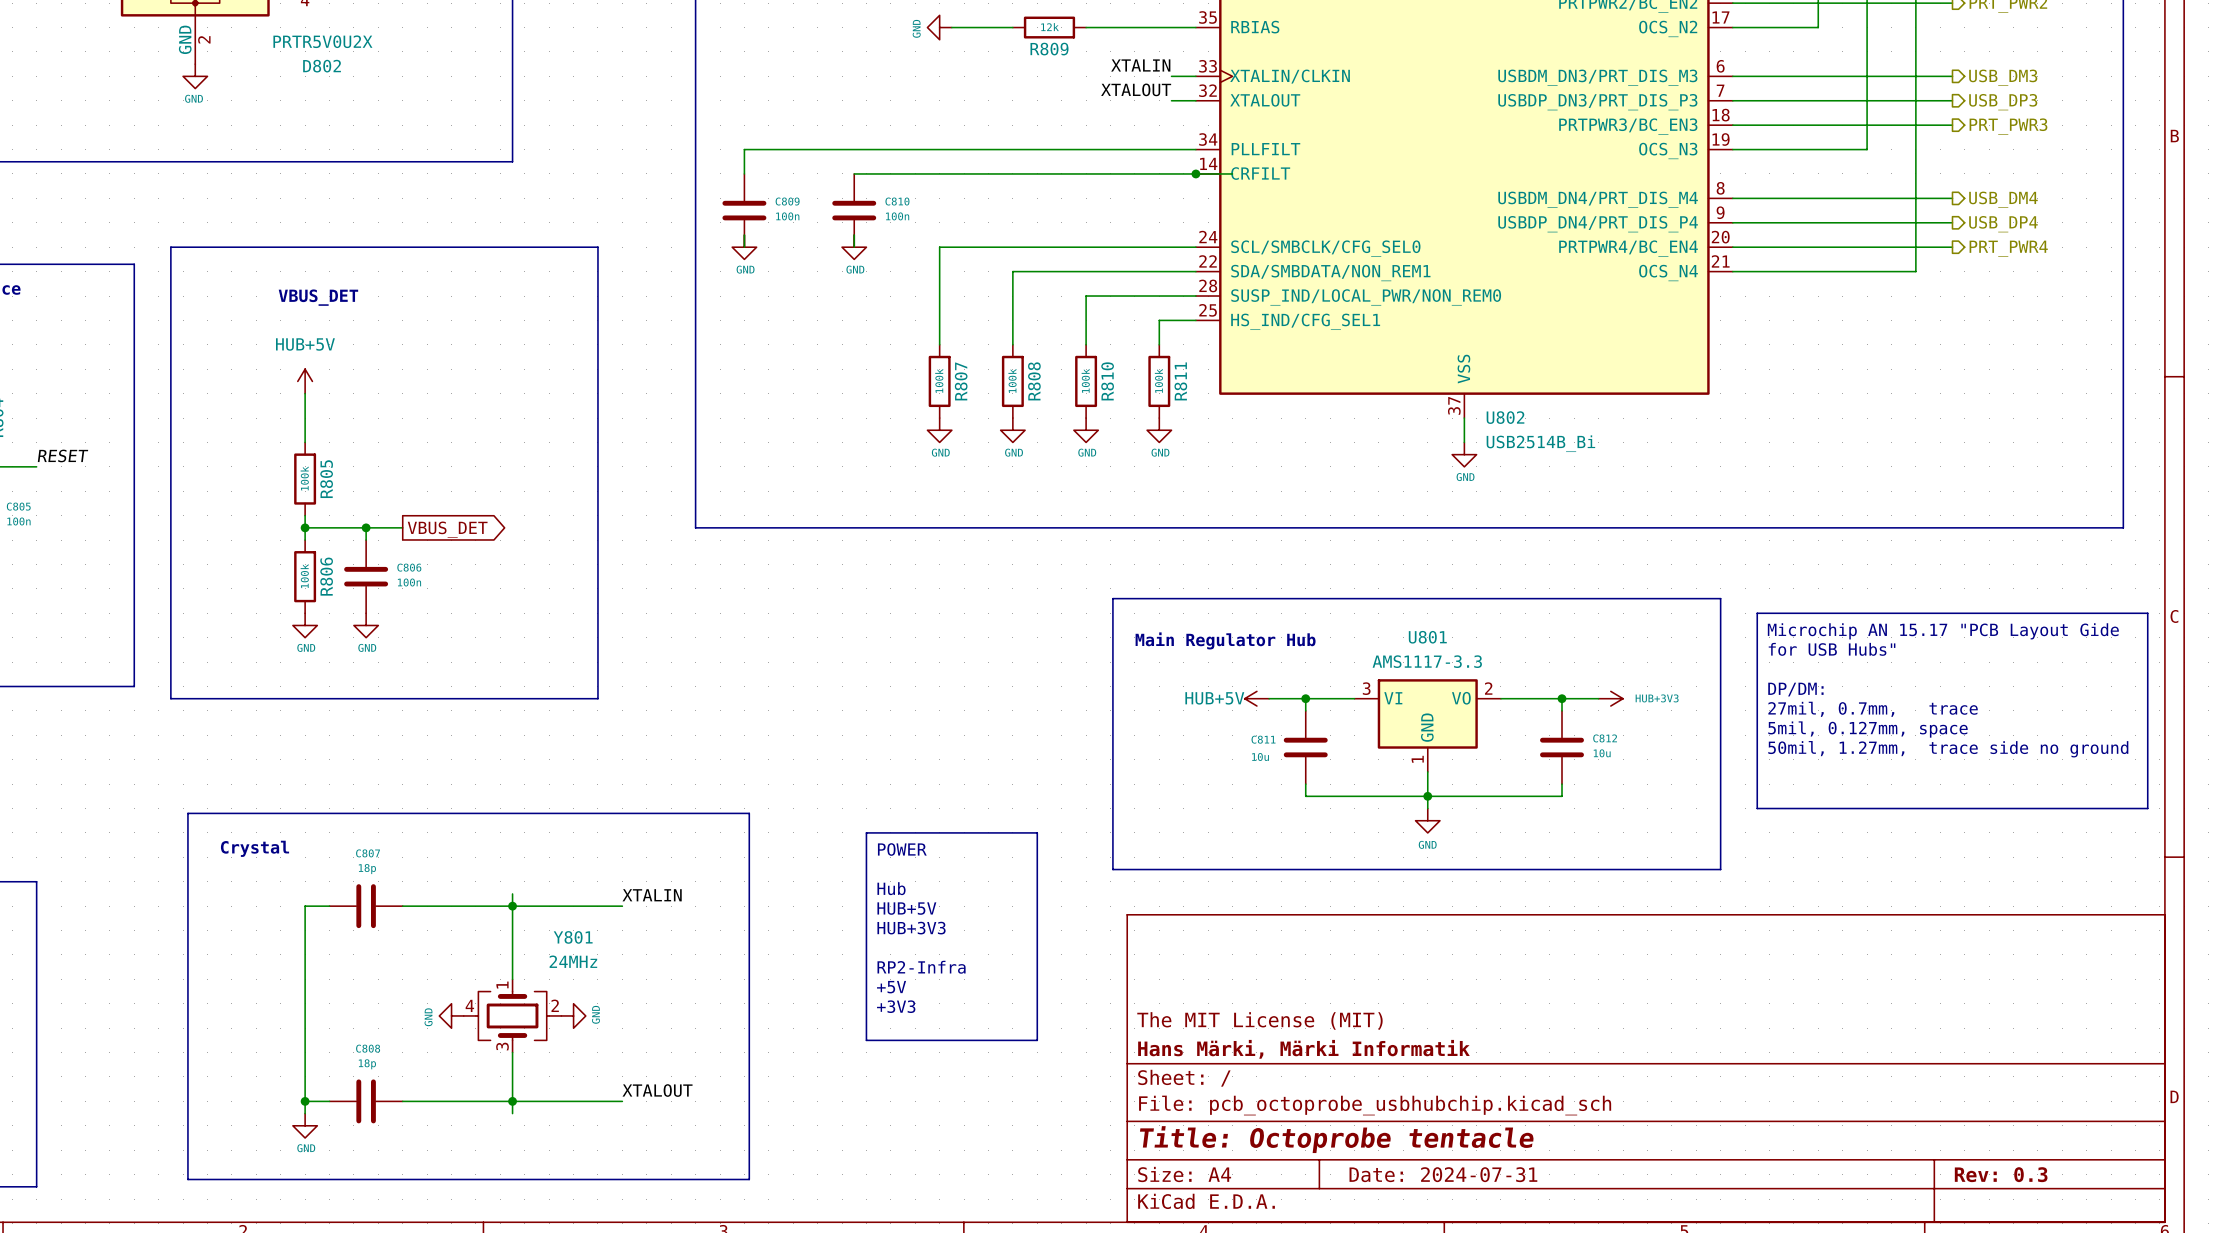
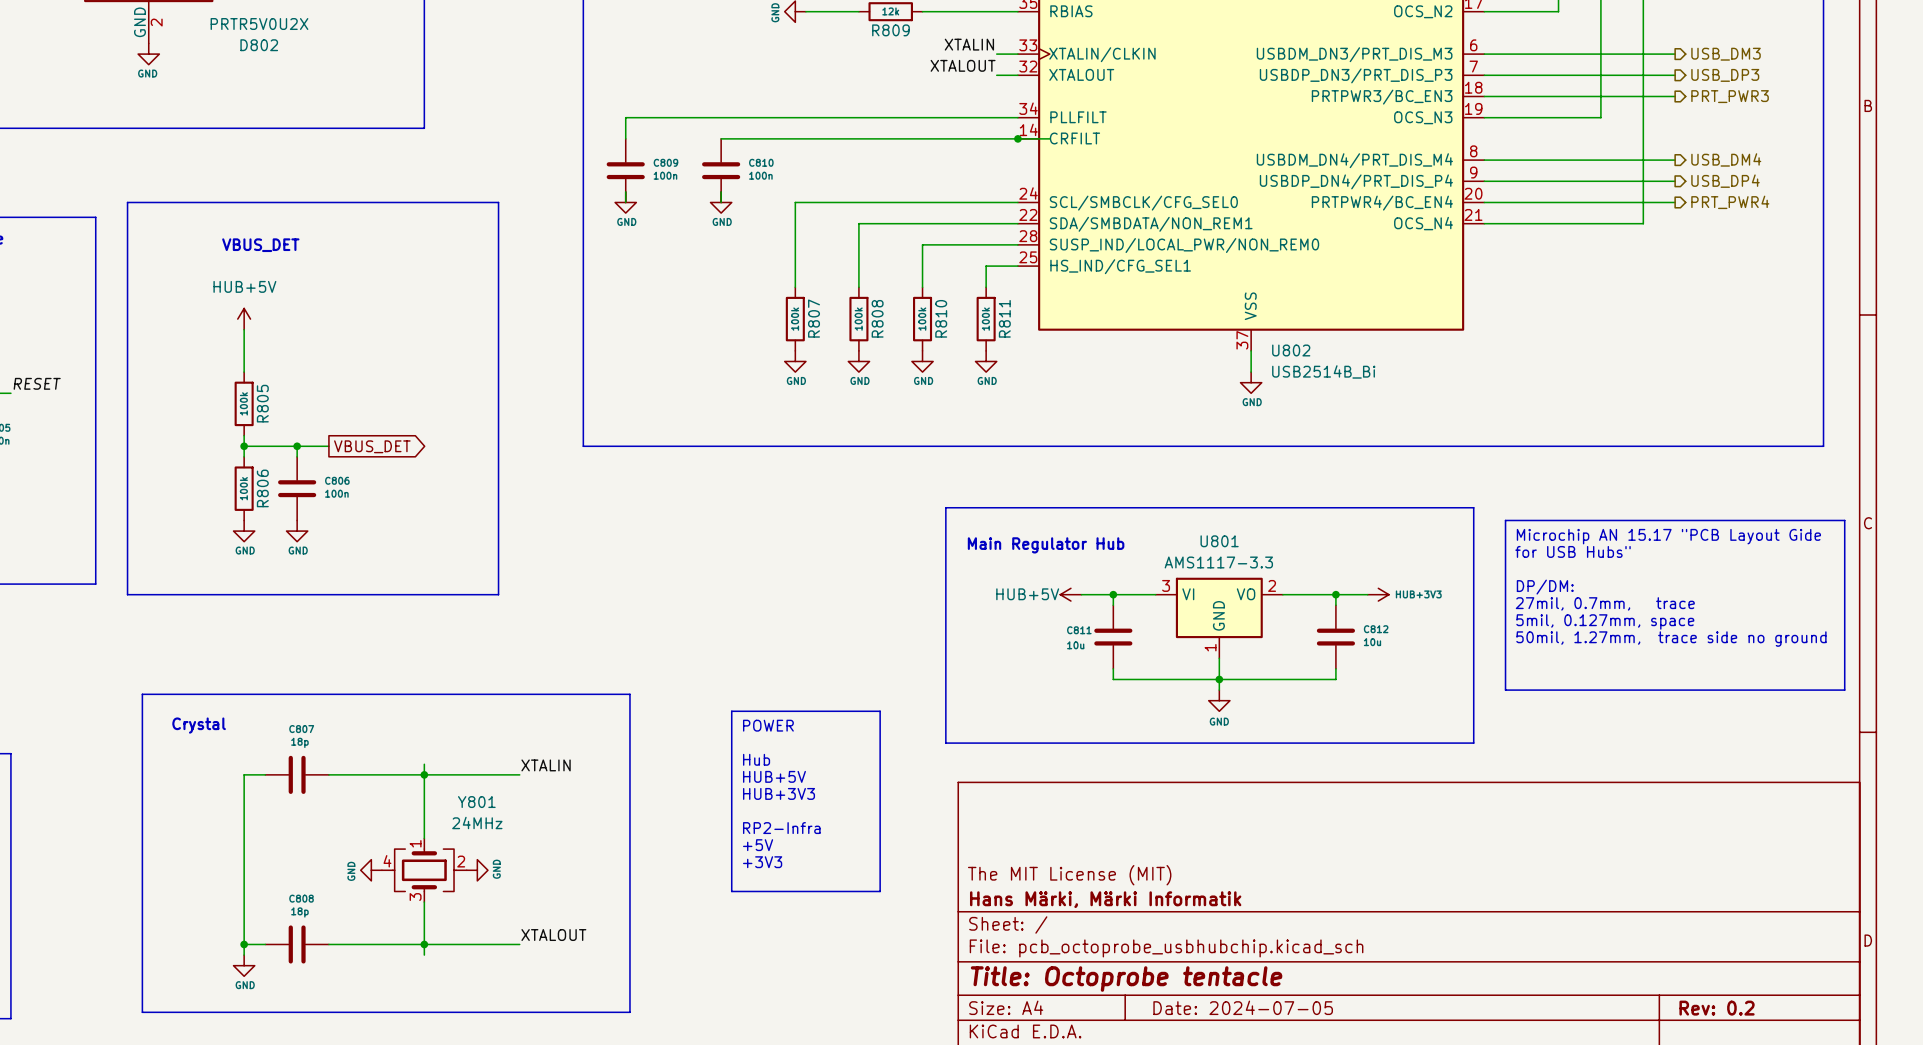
title block: Date: 2024-07-31 (1443, 1174) -> Date: 2024-07-05 (1243, 1007)
title block: Rev: 0.3 (2001, 1174) -> Rev: 0.2 (1717, 1008)

